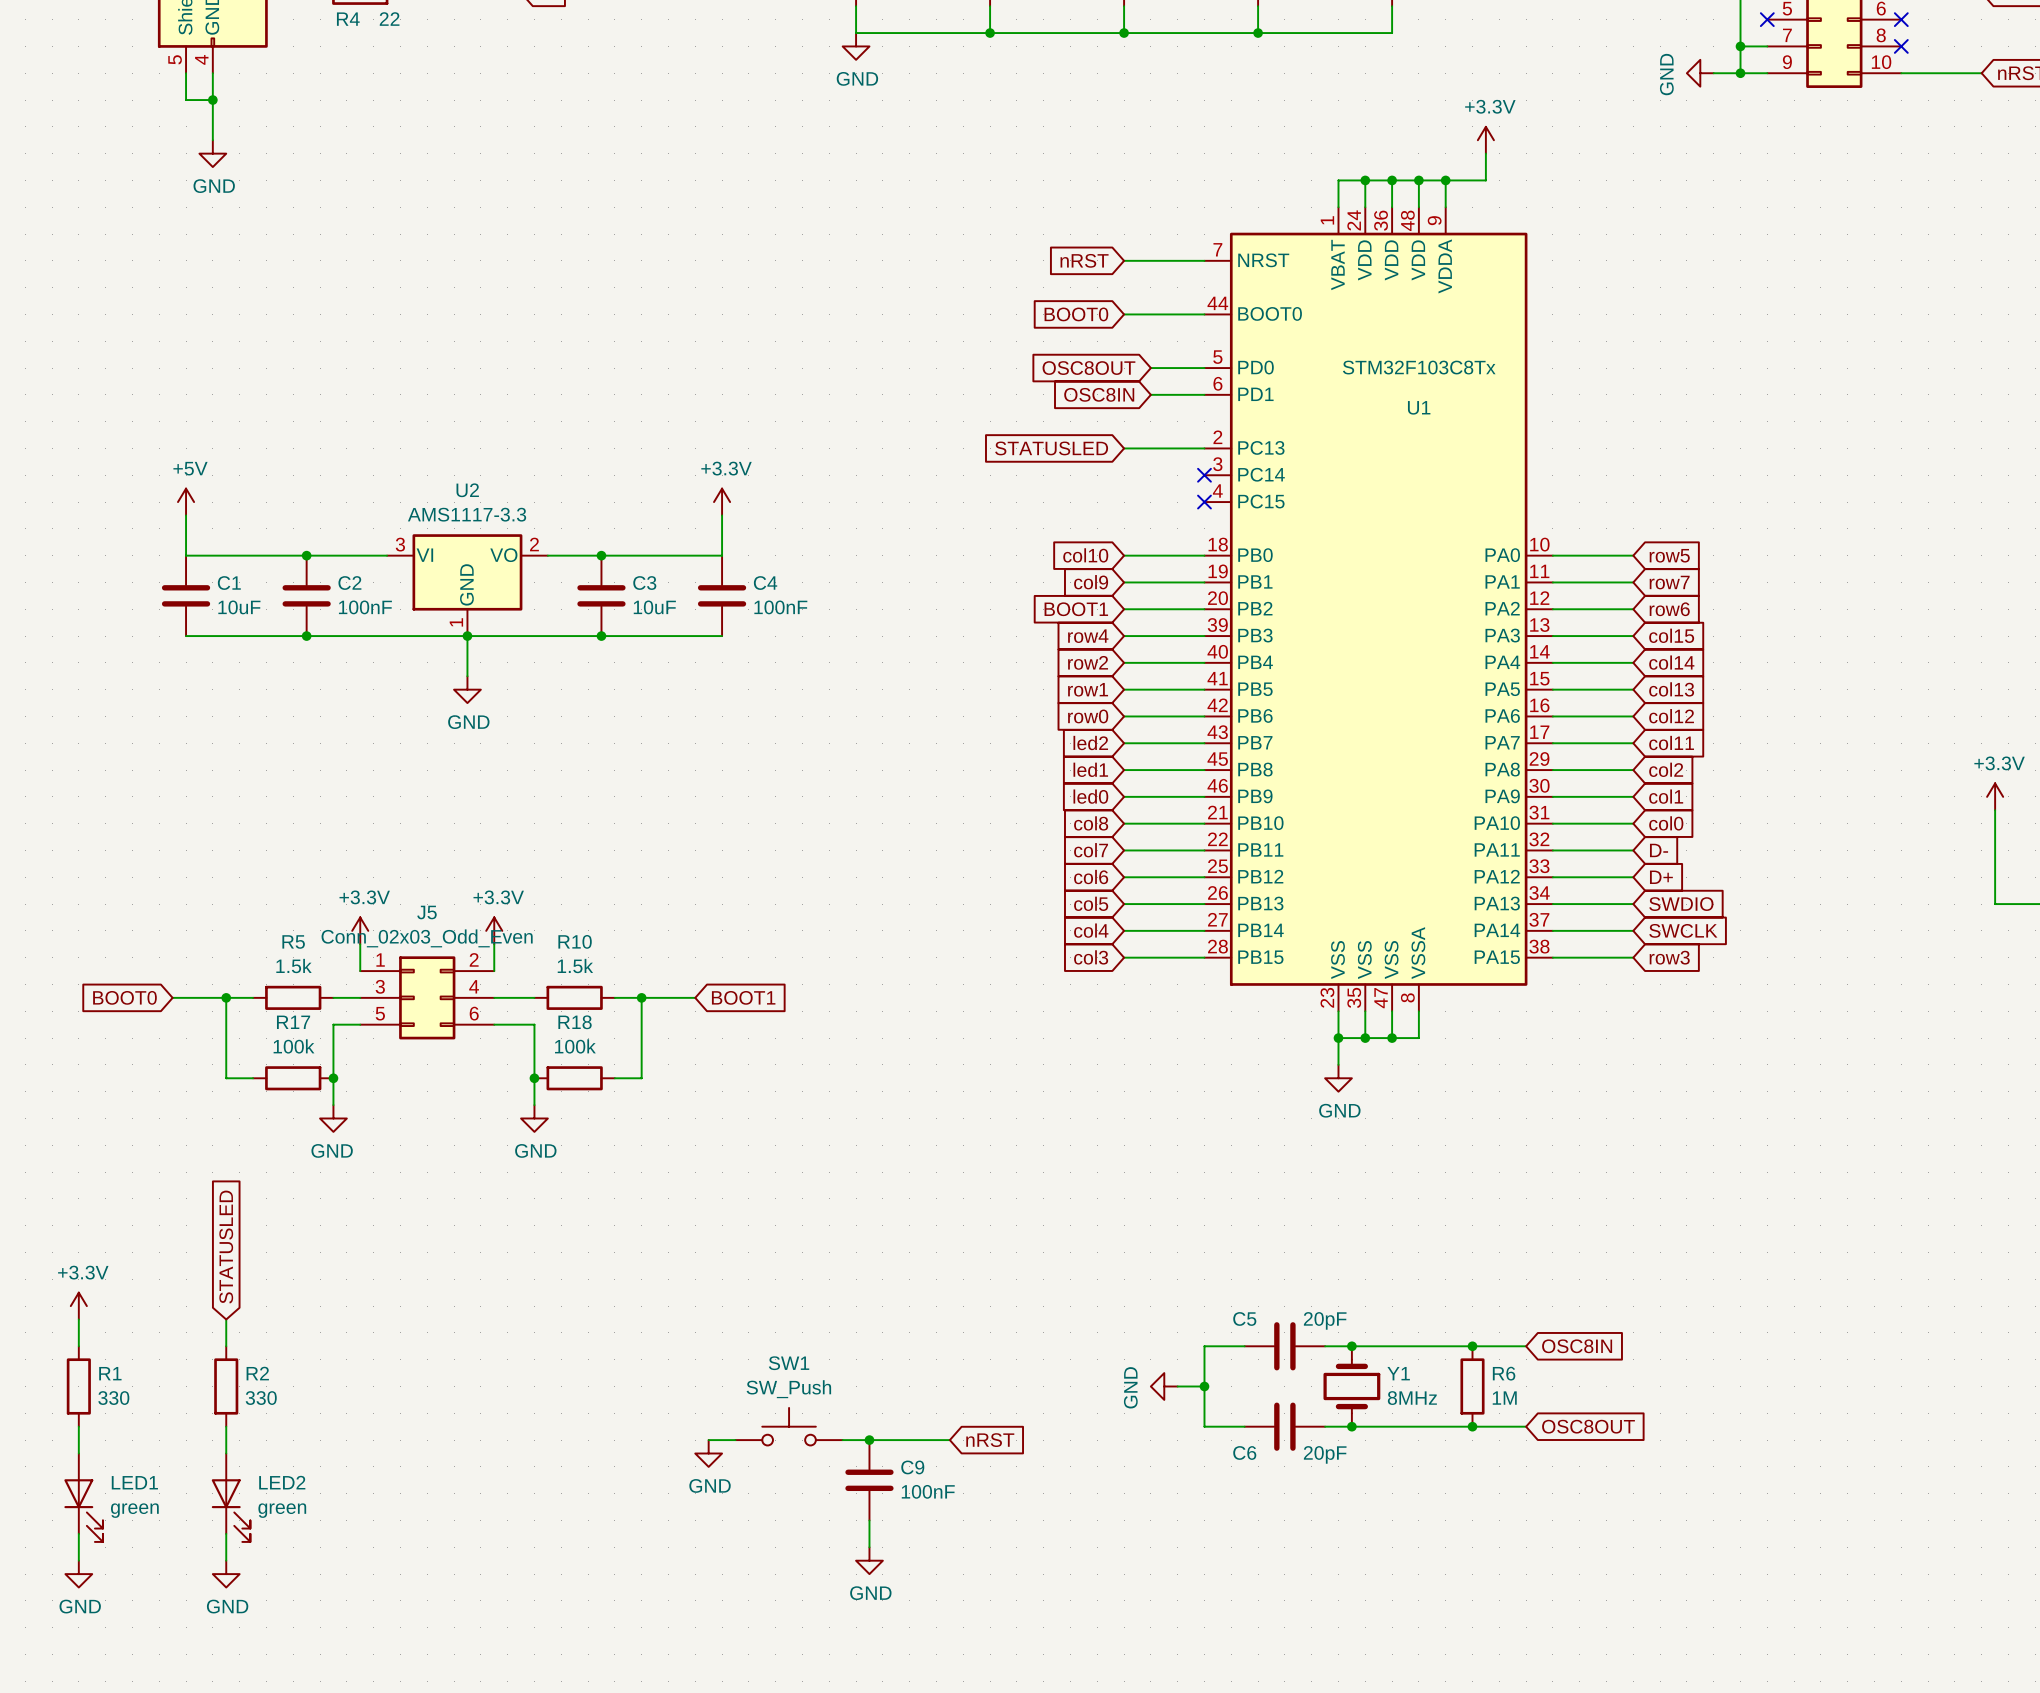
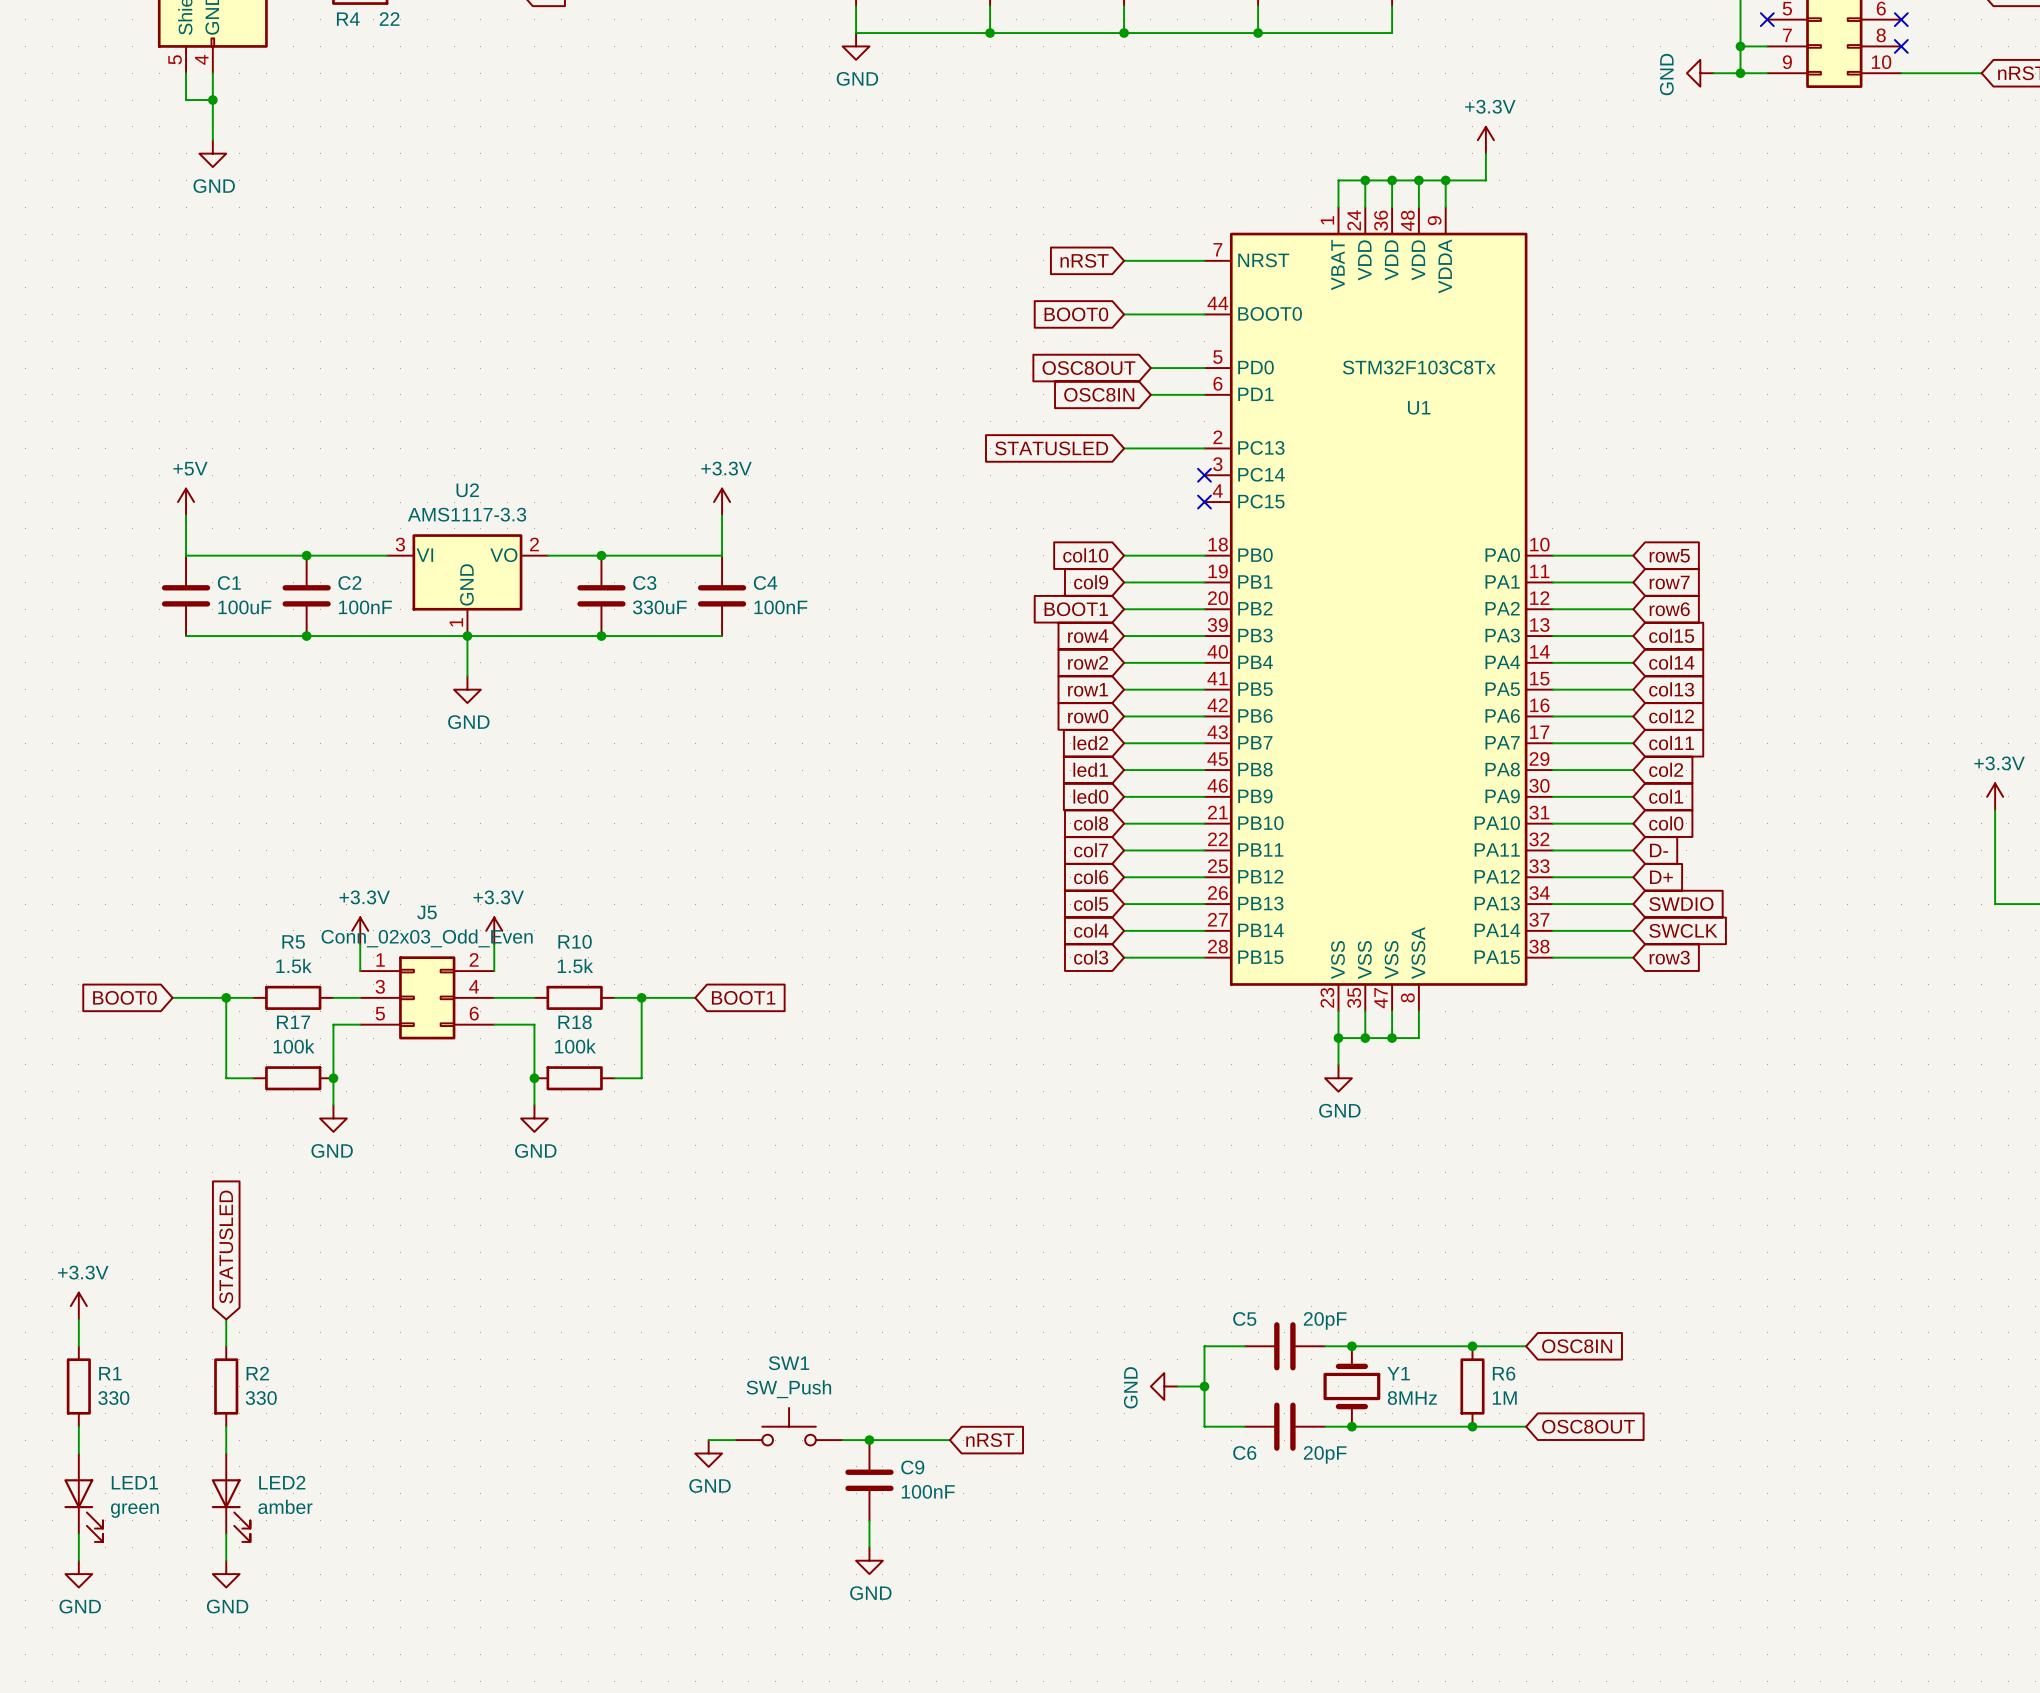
C1 value: 10uF (239, 607) -> 100uF (244, 607)
C3 value: 10uF (654, 607) -> 330uF (659, 607)
LED2 value: green (282, 1510) -> amber (285, 1506)

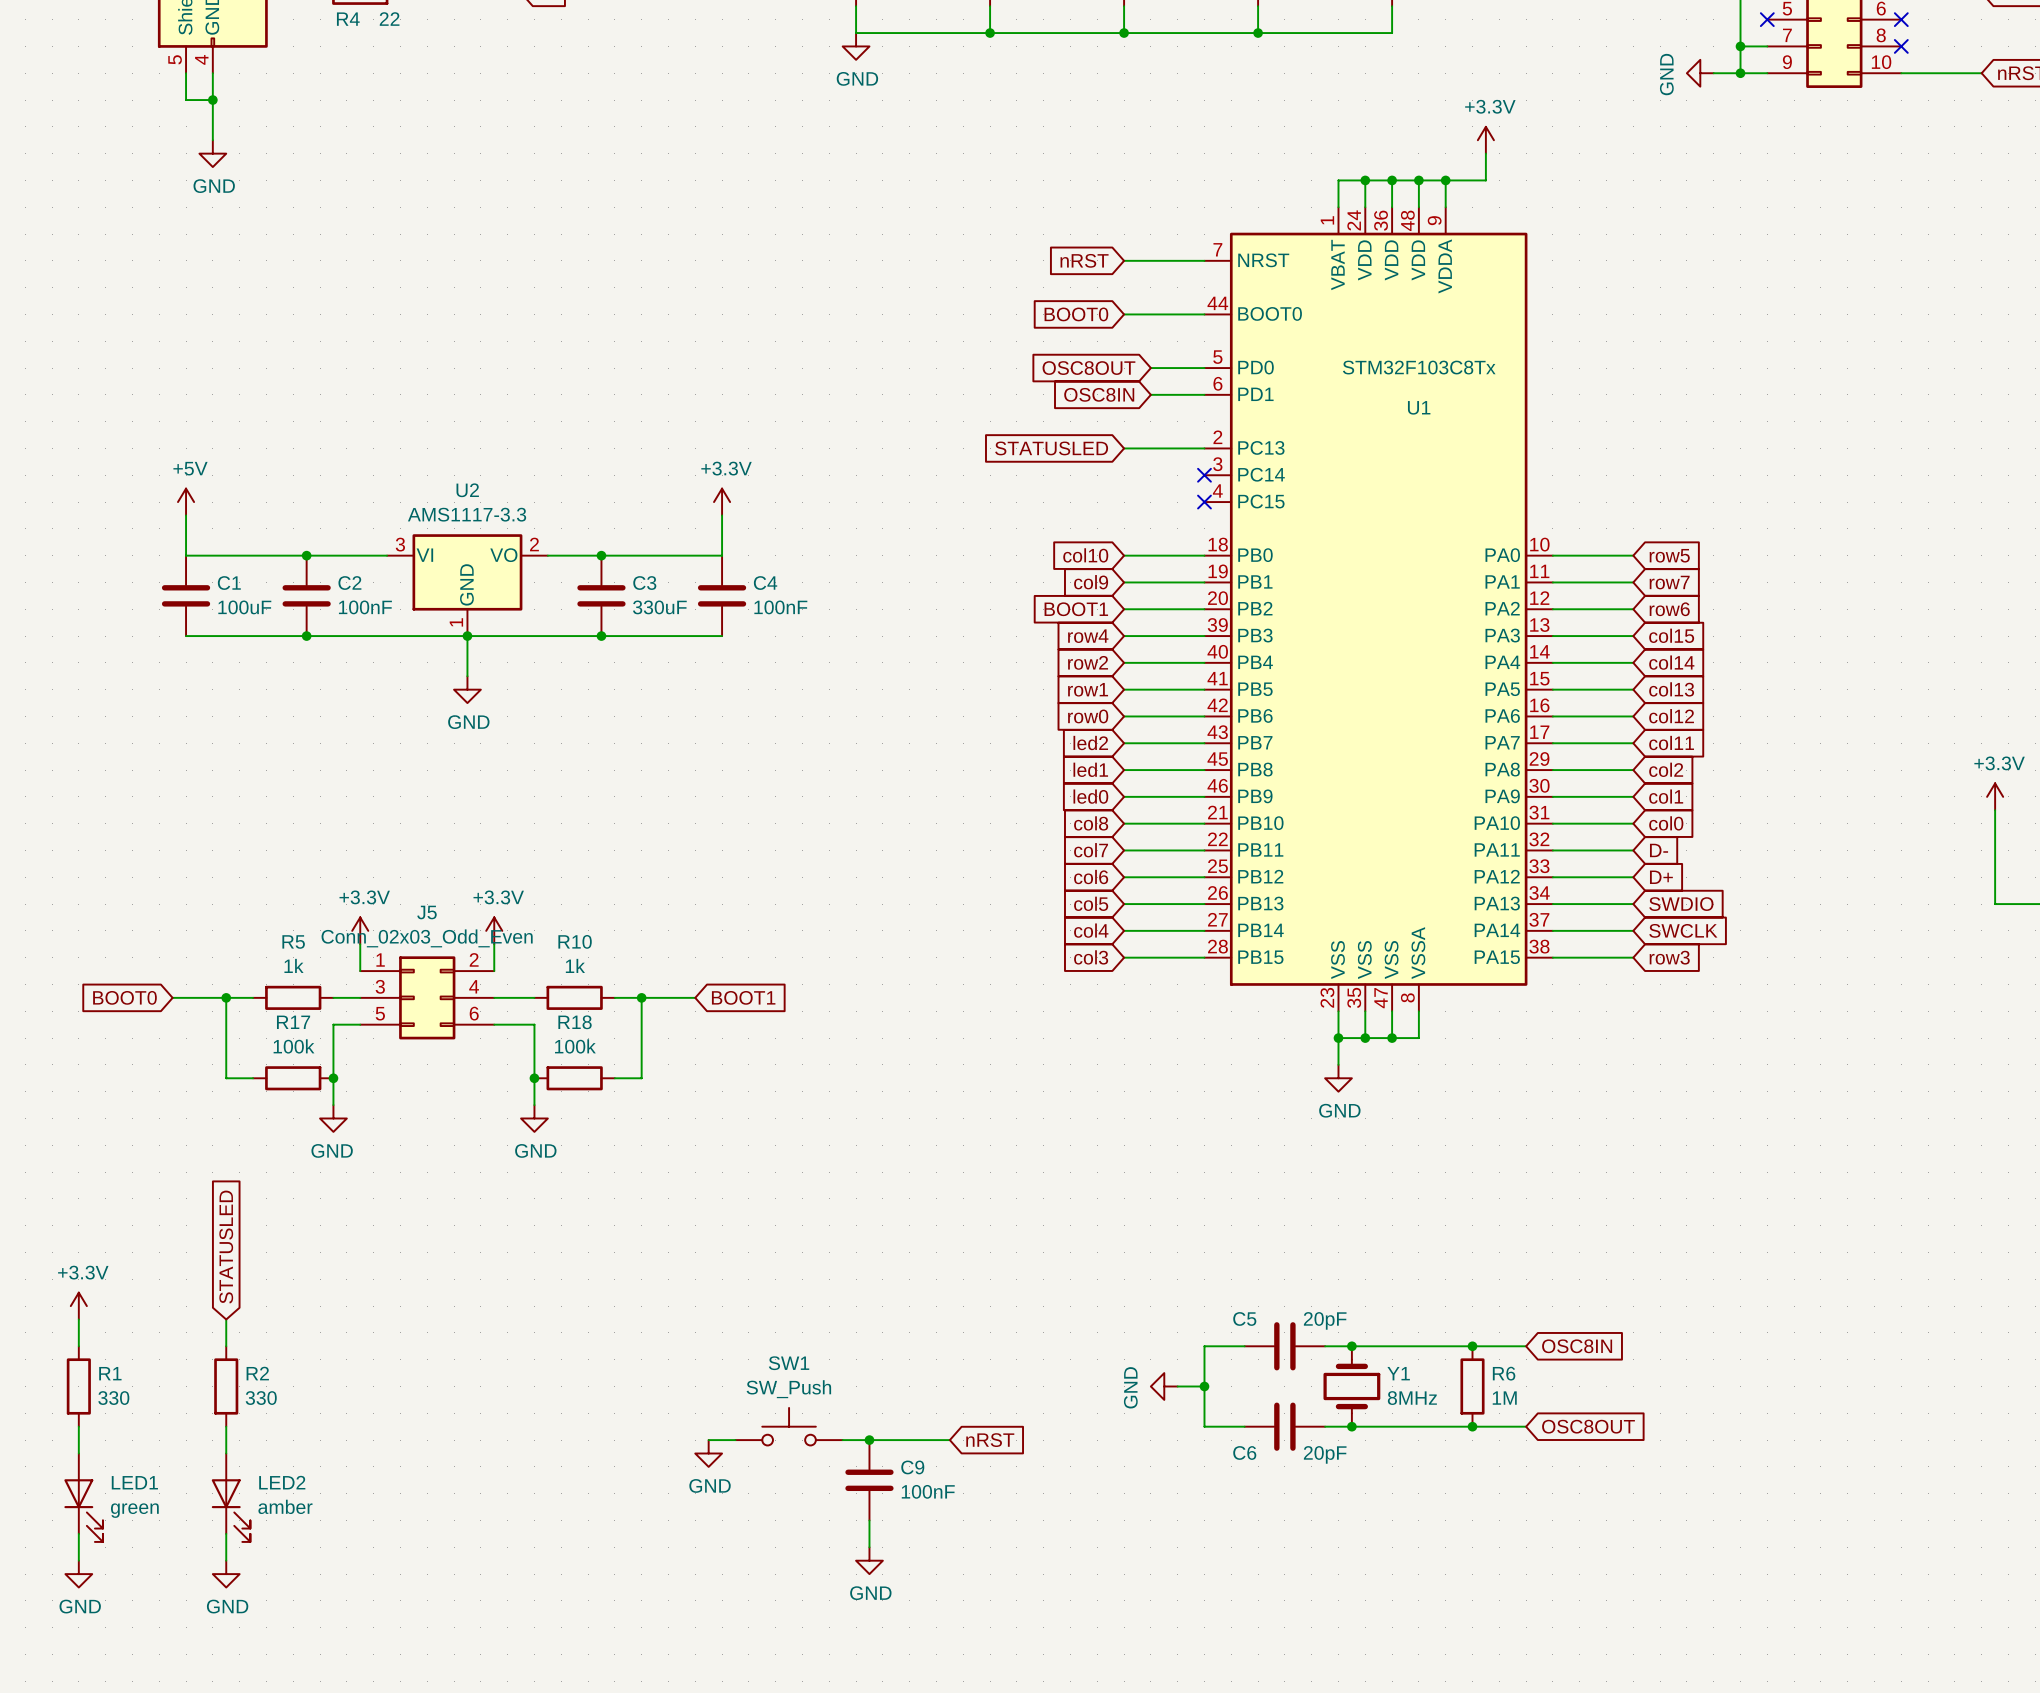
R5 value: 1.5k (294, 966) -> 1k (294, 965)
R10 value: 1.5k (575, 966) -> 1k (575, 965)

